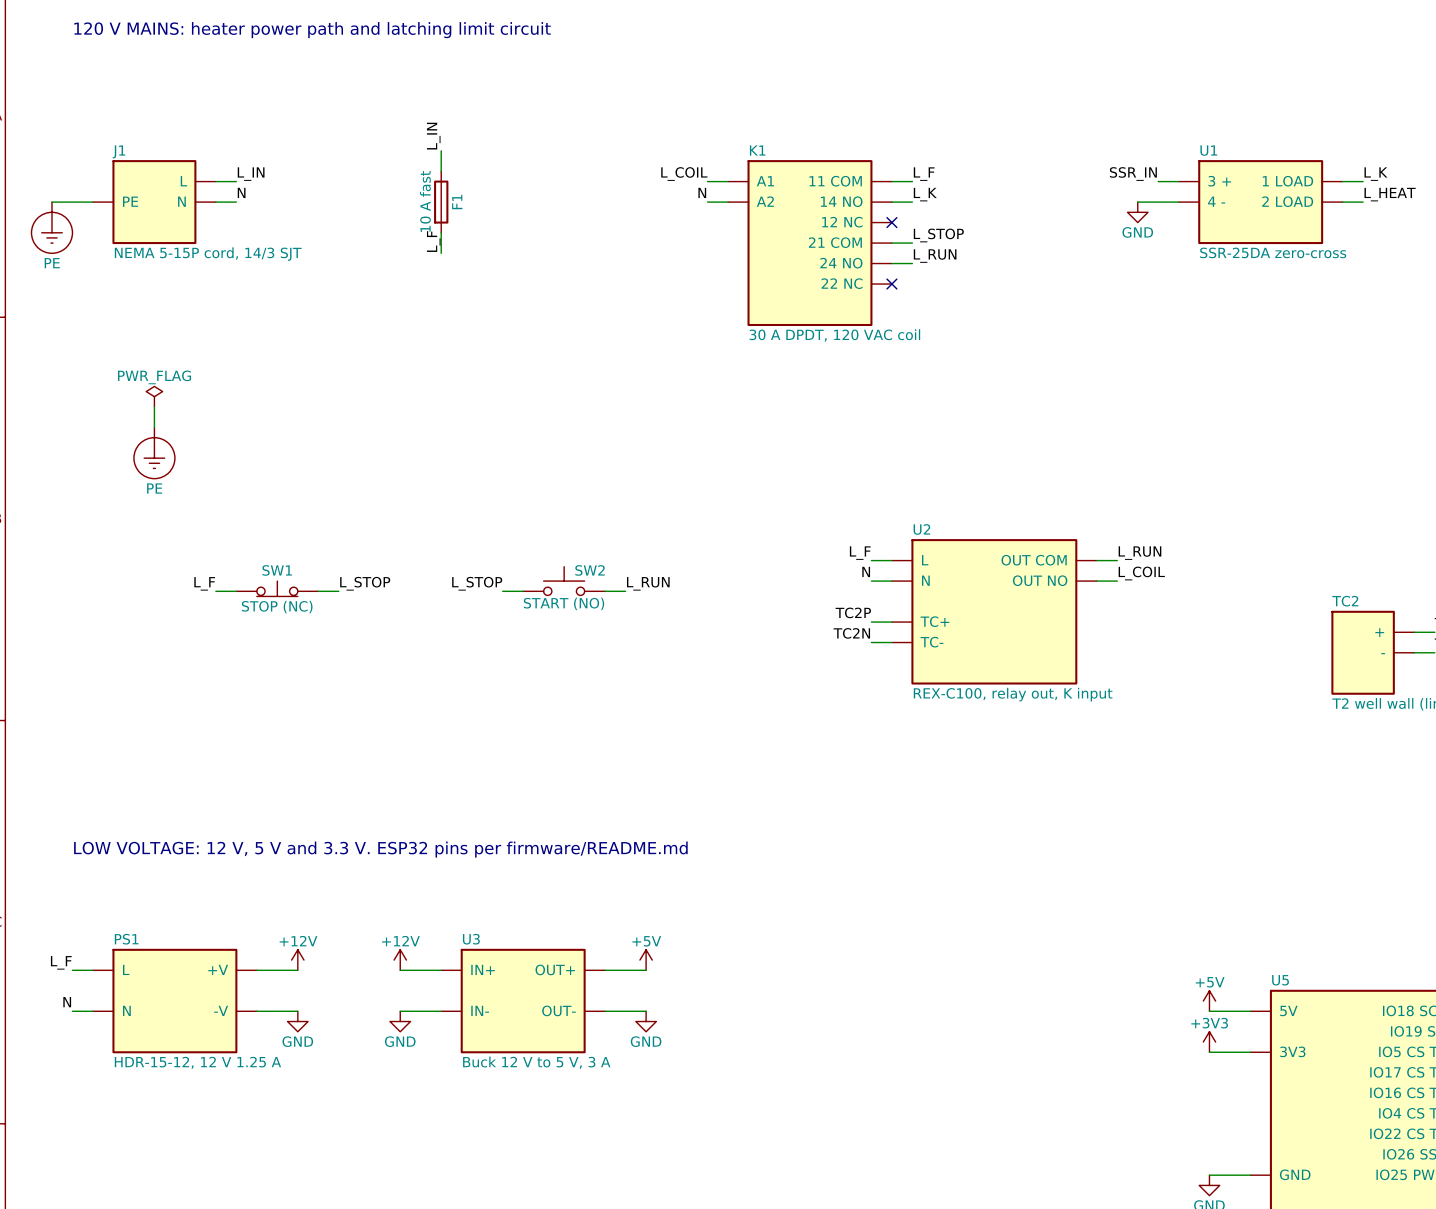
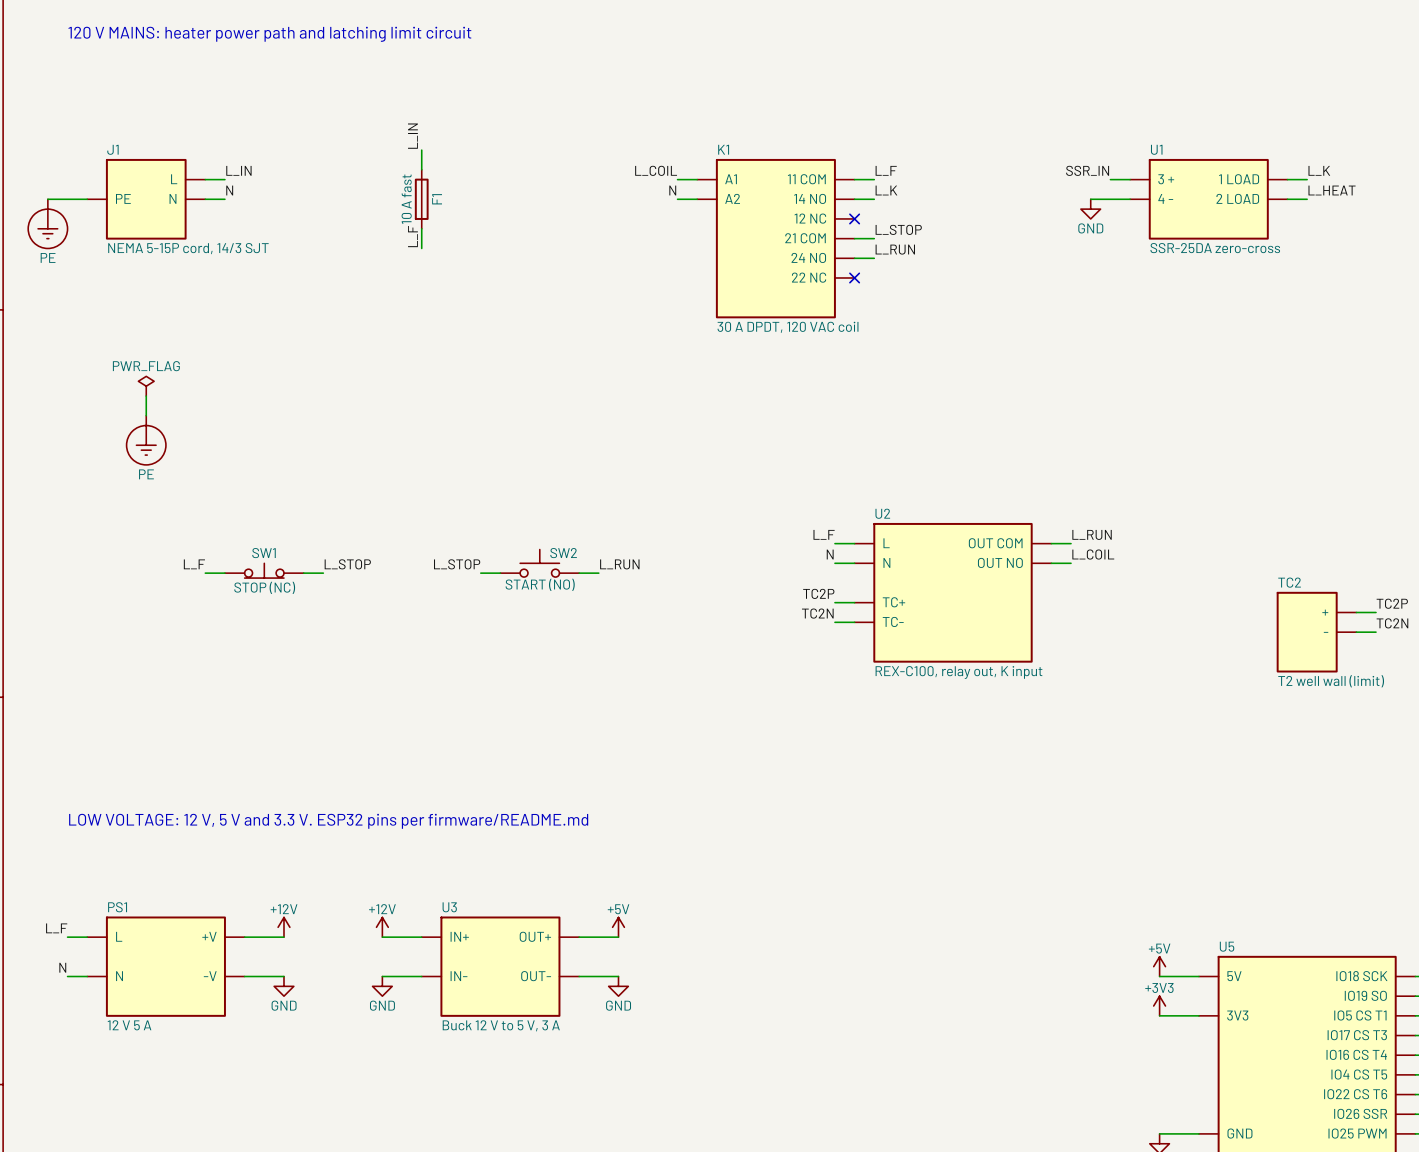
PS1 value: HDR-15-12, 12 V 1.25 A (197, 1062) -> 12 V 5 A (129, 1025)

